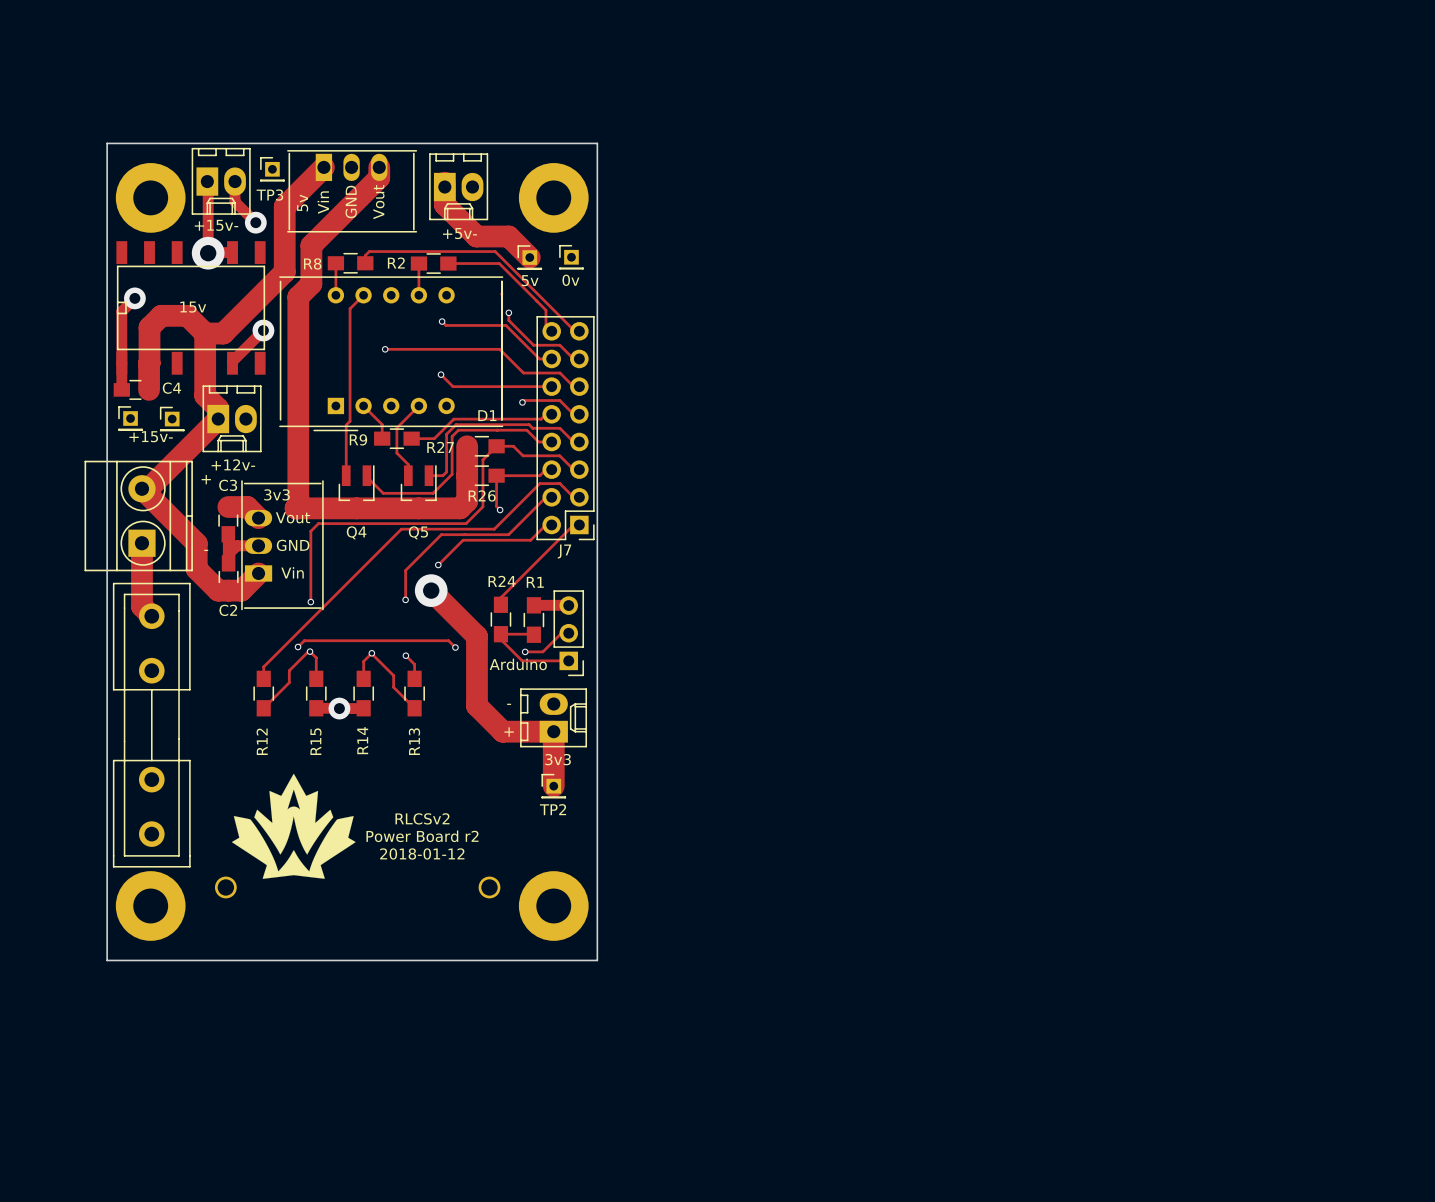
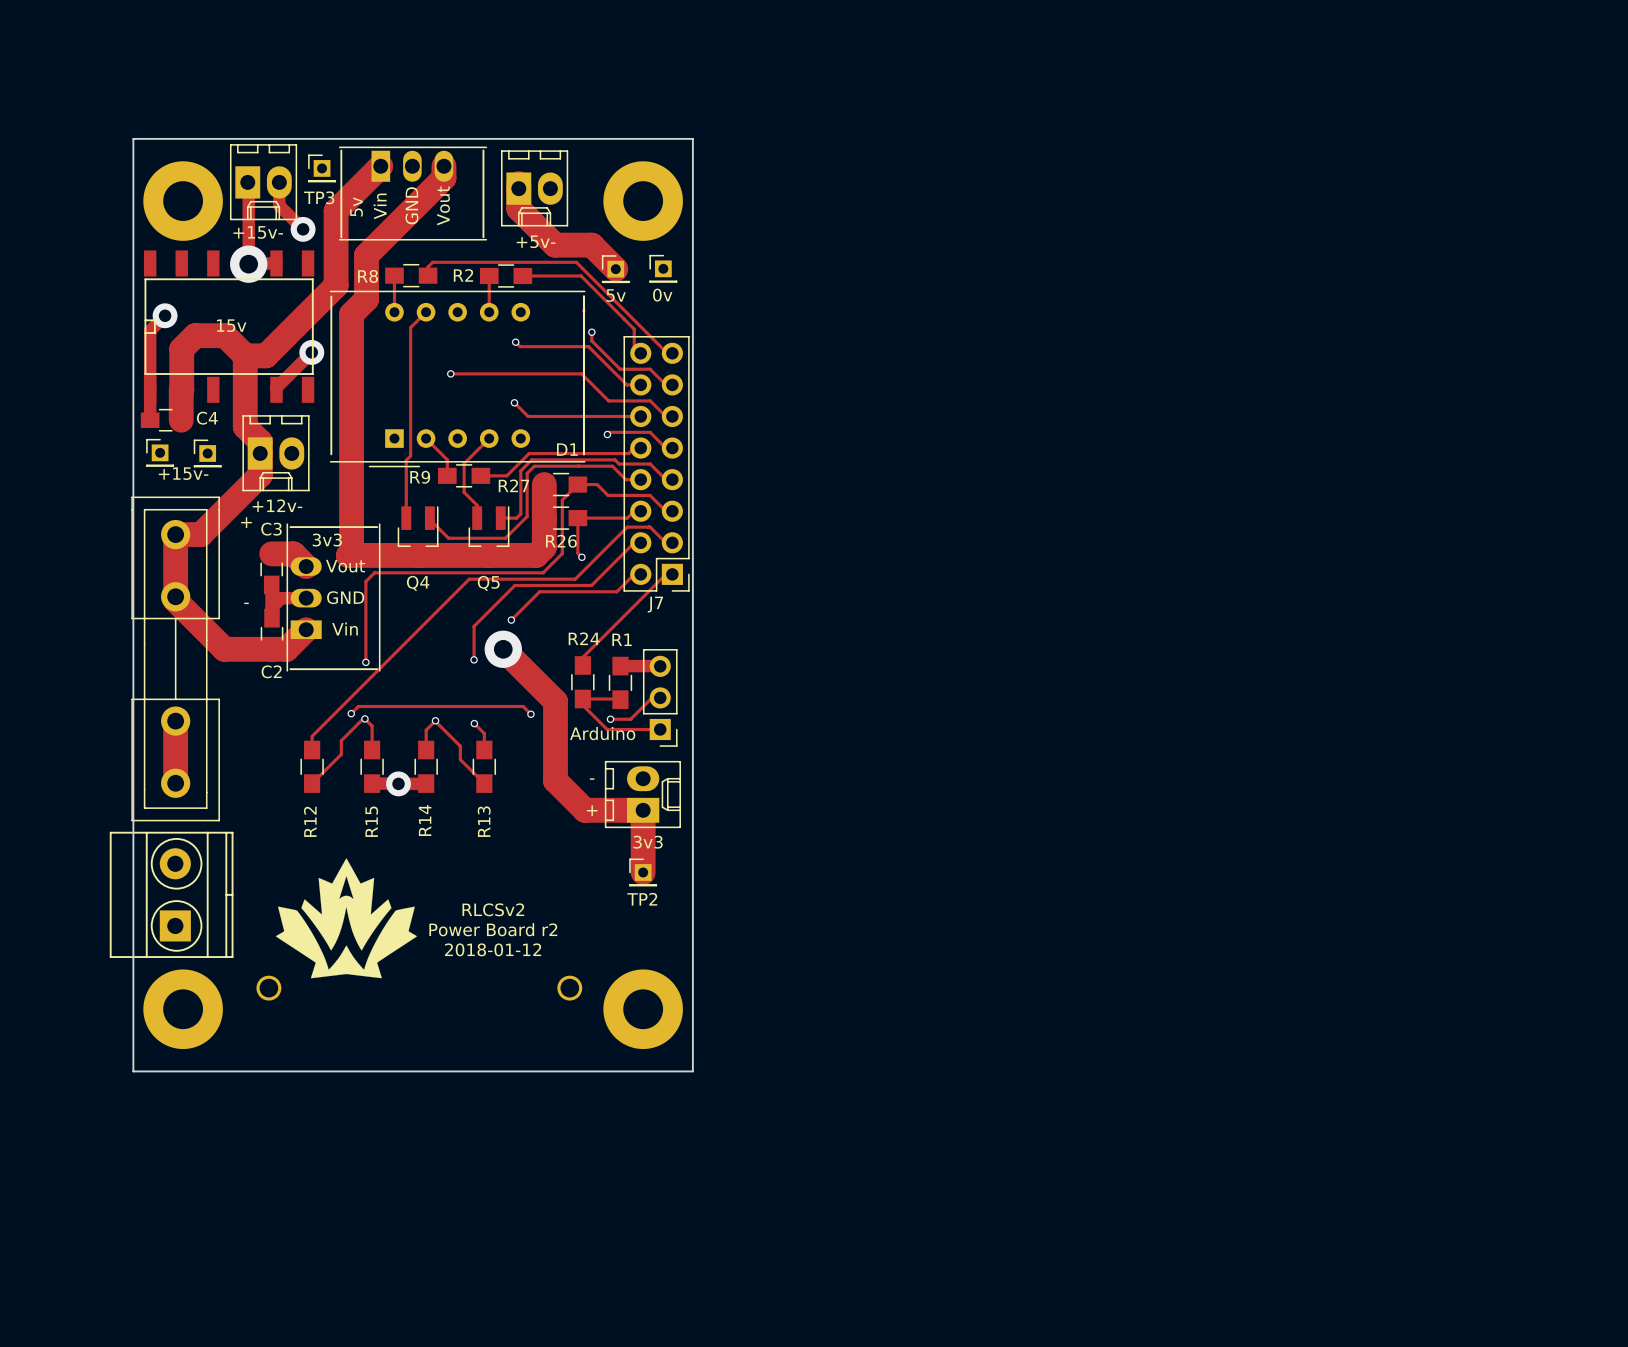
track: (218, 419) (148, 488) (141, 488) (196, 543) (196, 569) (218, 590) -> (260, 453) (260, 475) (200, 534) (175, 534) (175, 600) (224, 649) (260, 649)
part: (138, 516) -> none
track: (141, 543) (141, 606) (151, 616) -> none
track: none -> (175, 721) (175, 783)
part rotation: 0° (151, 725) -> 180° (175, 658)
part: none -> (171, 894)

